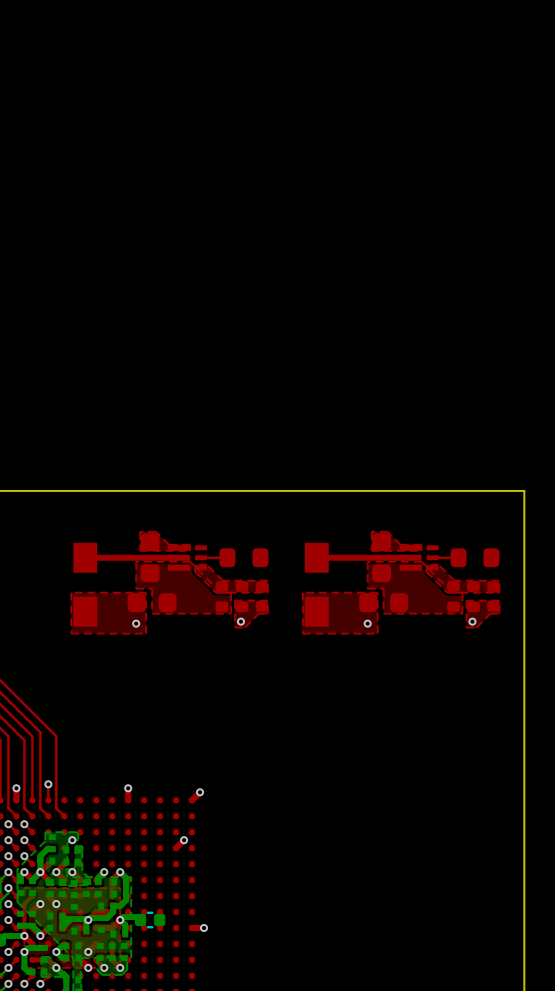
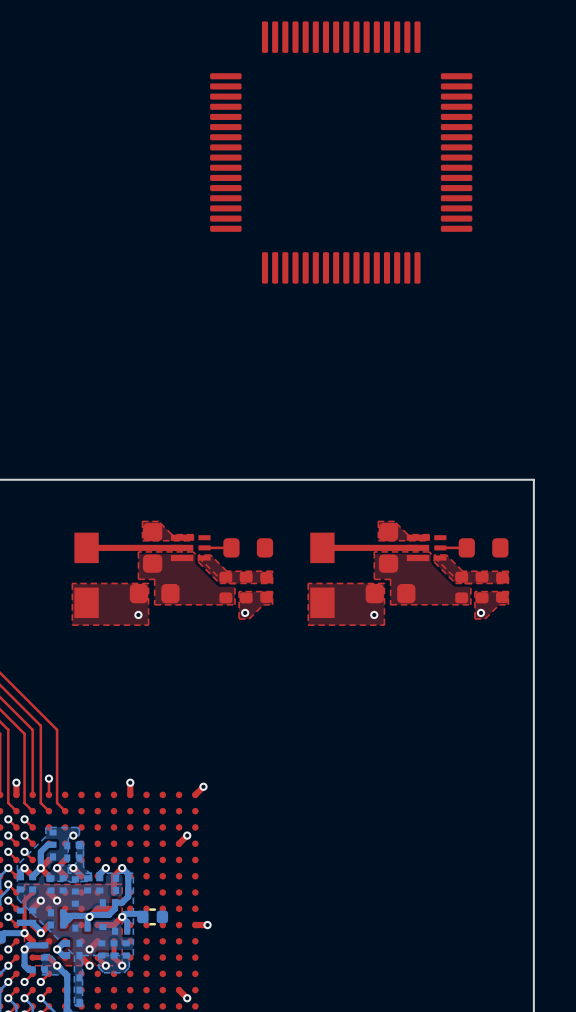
part: none -> (341, 152)

